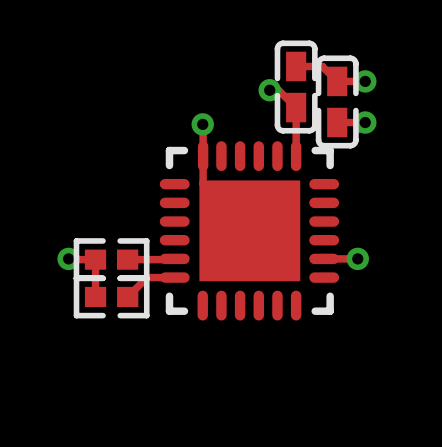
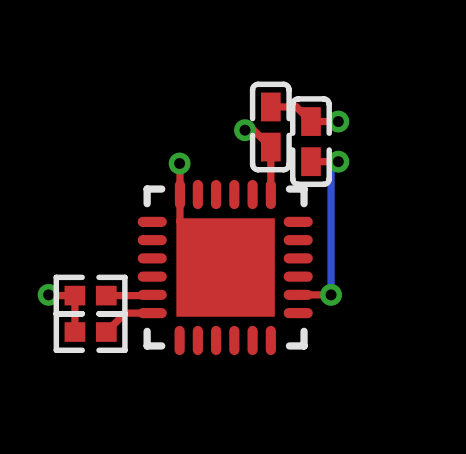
bottom track: none -> (331, 168) (331, 294)

